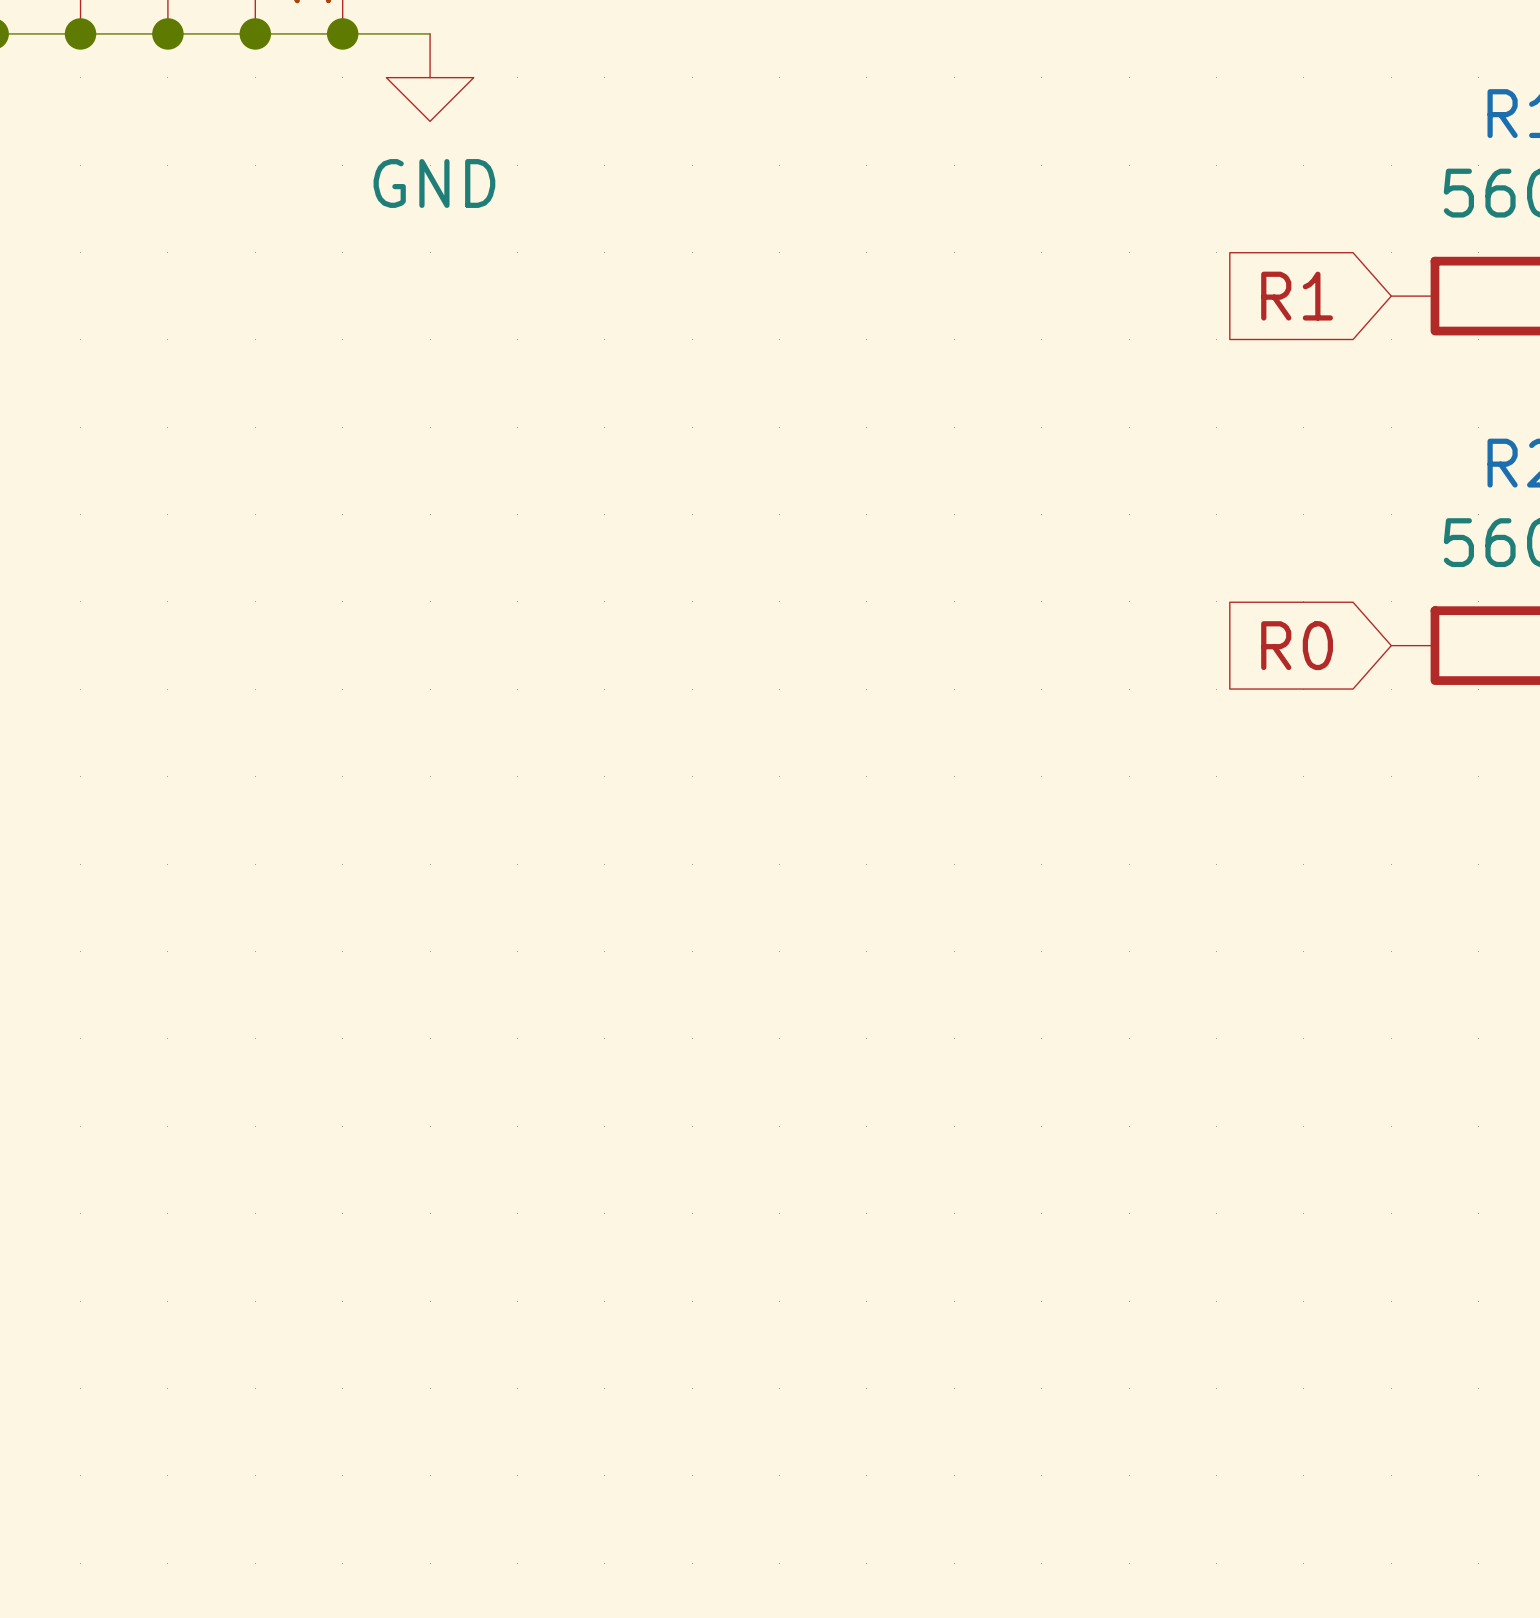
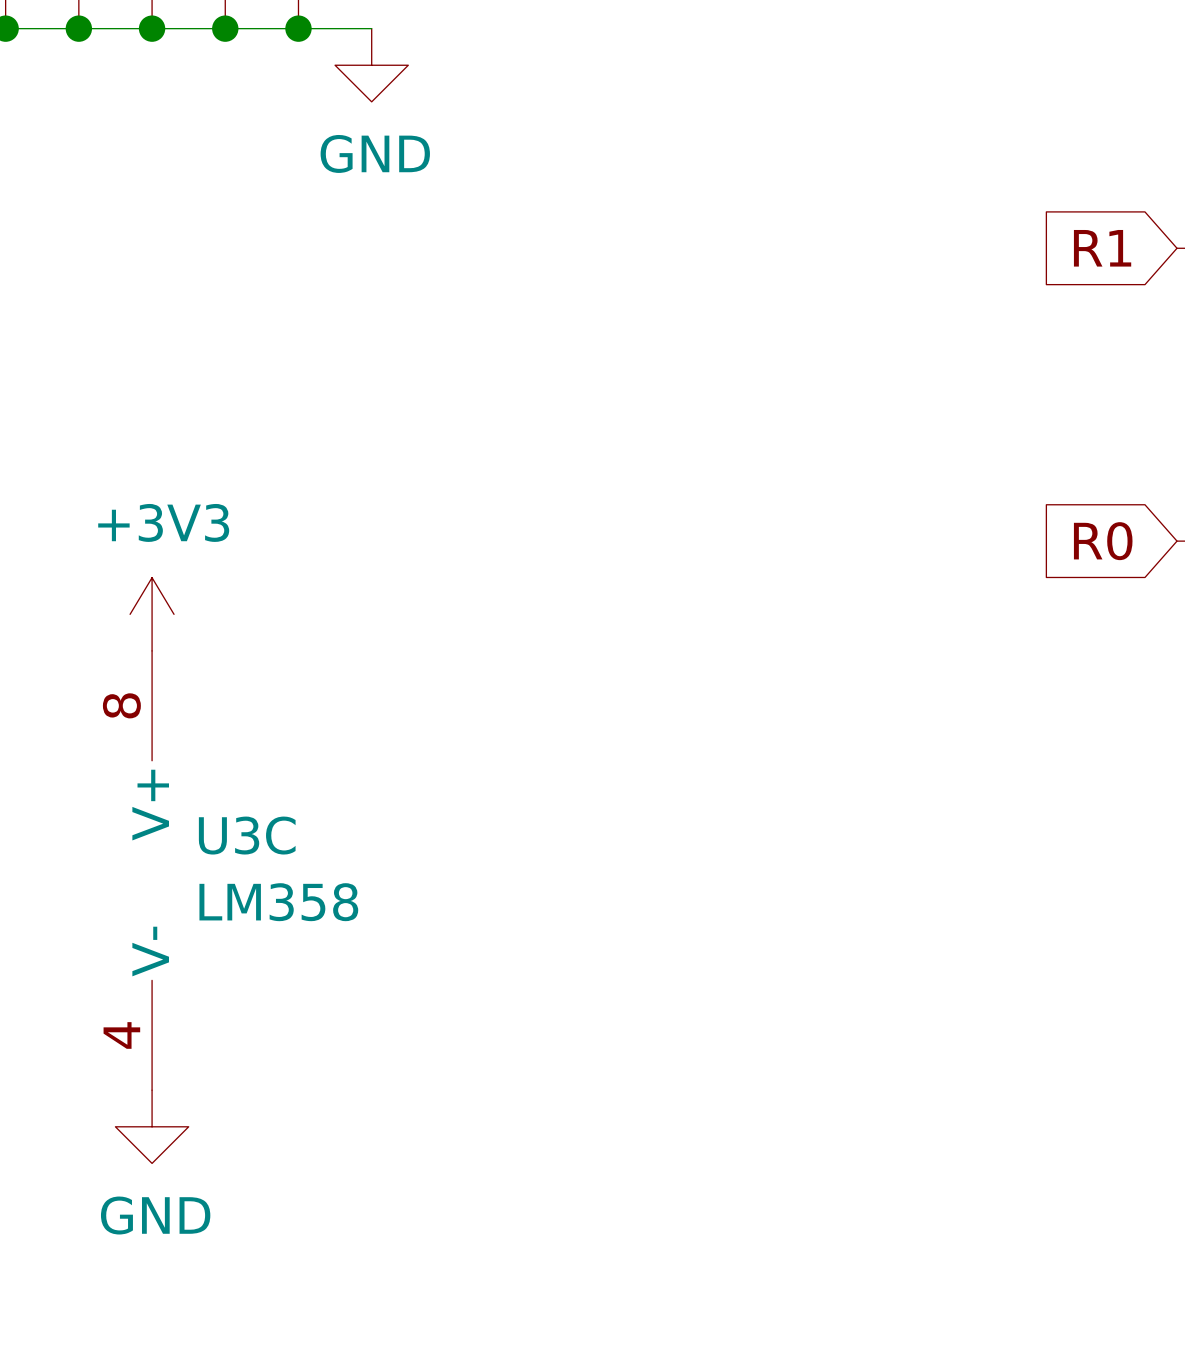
power symbol: none -> +3V3 (152, 614)
U3C: none -> LM358 (152, 870)
power symbol: none -> GND (152, 1126)

